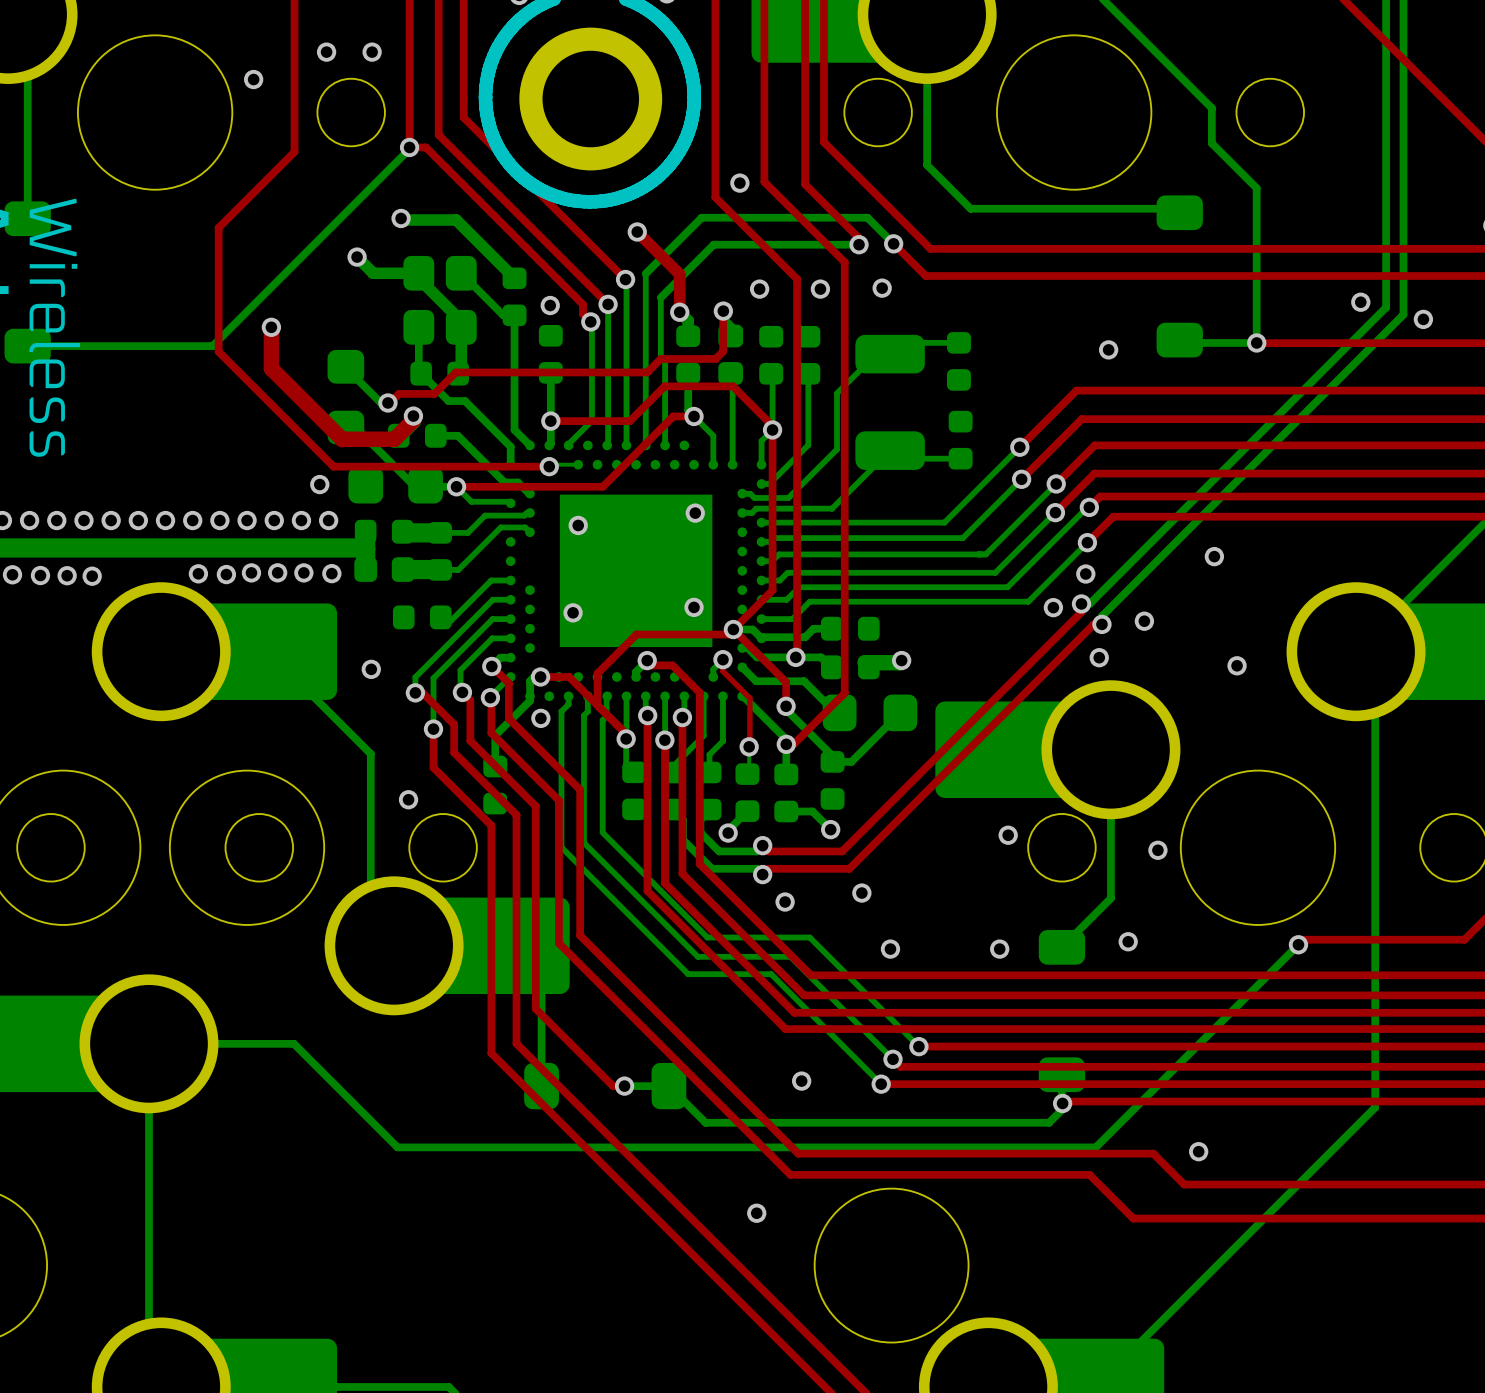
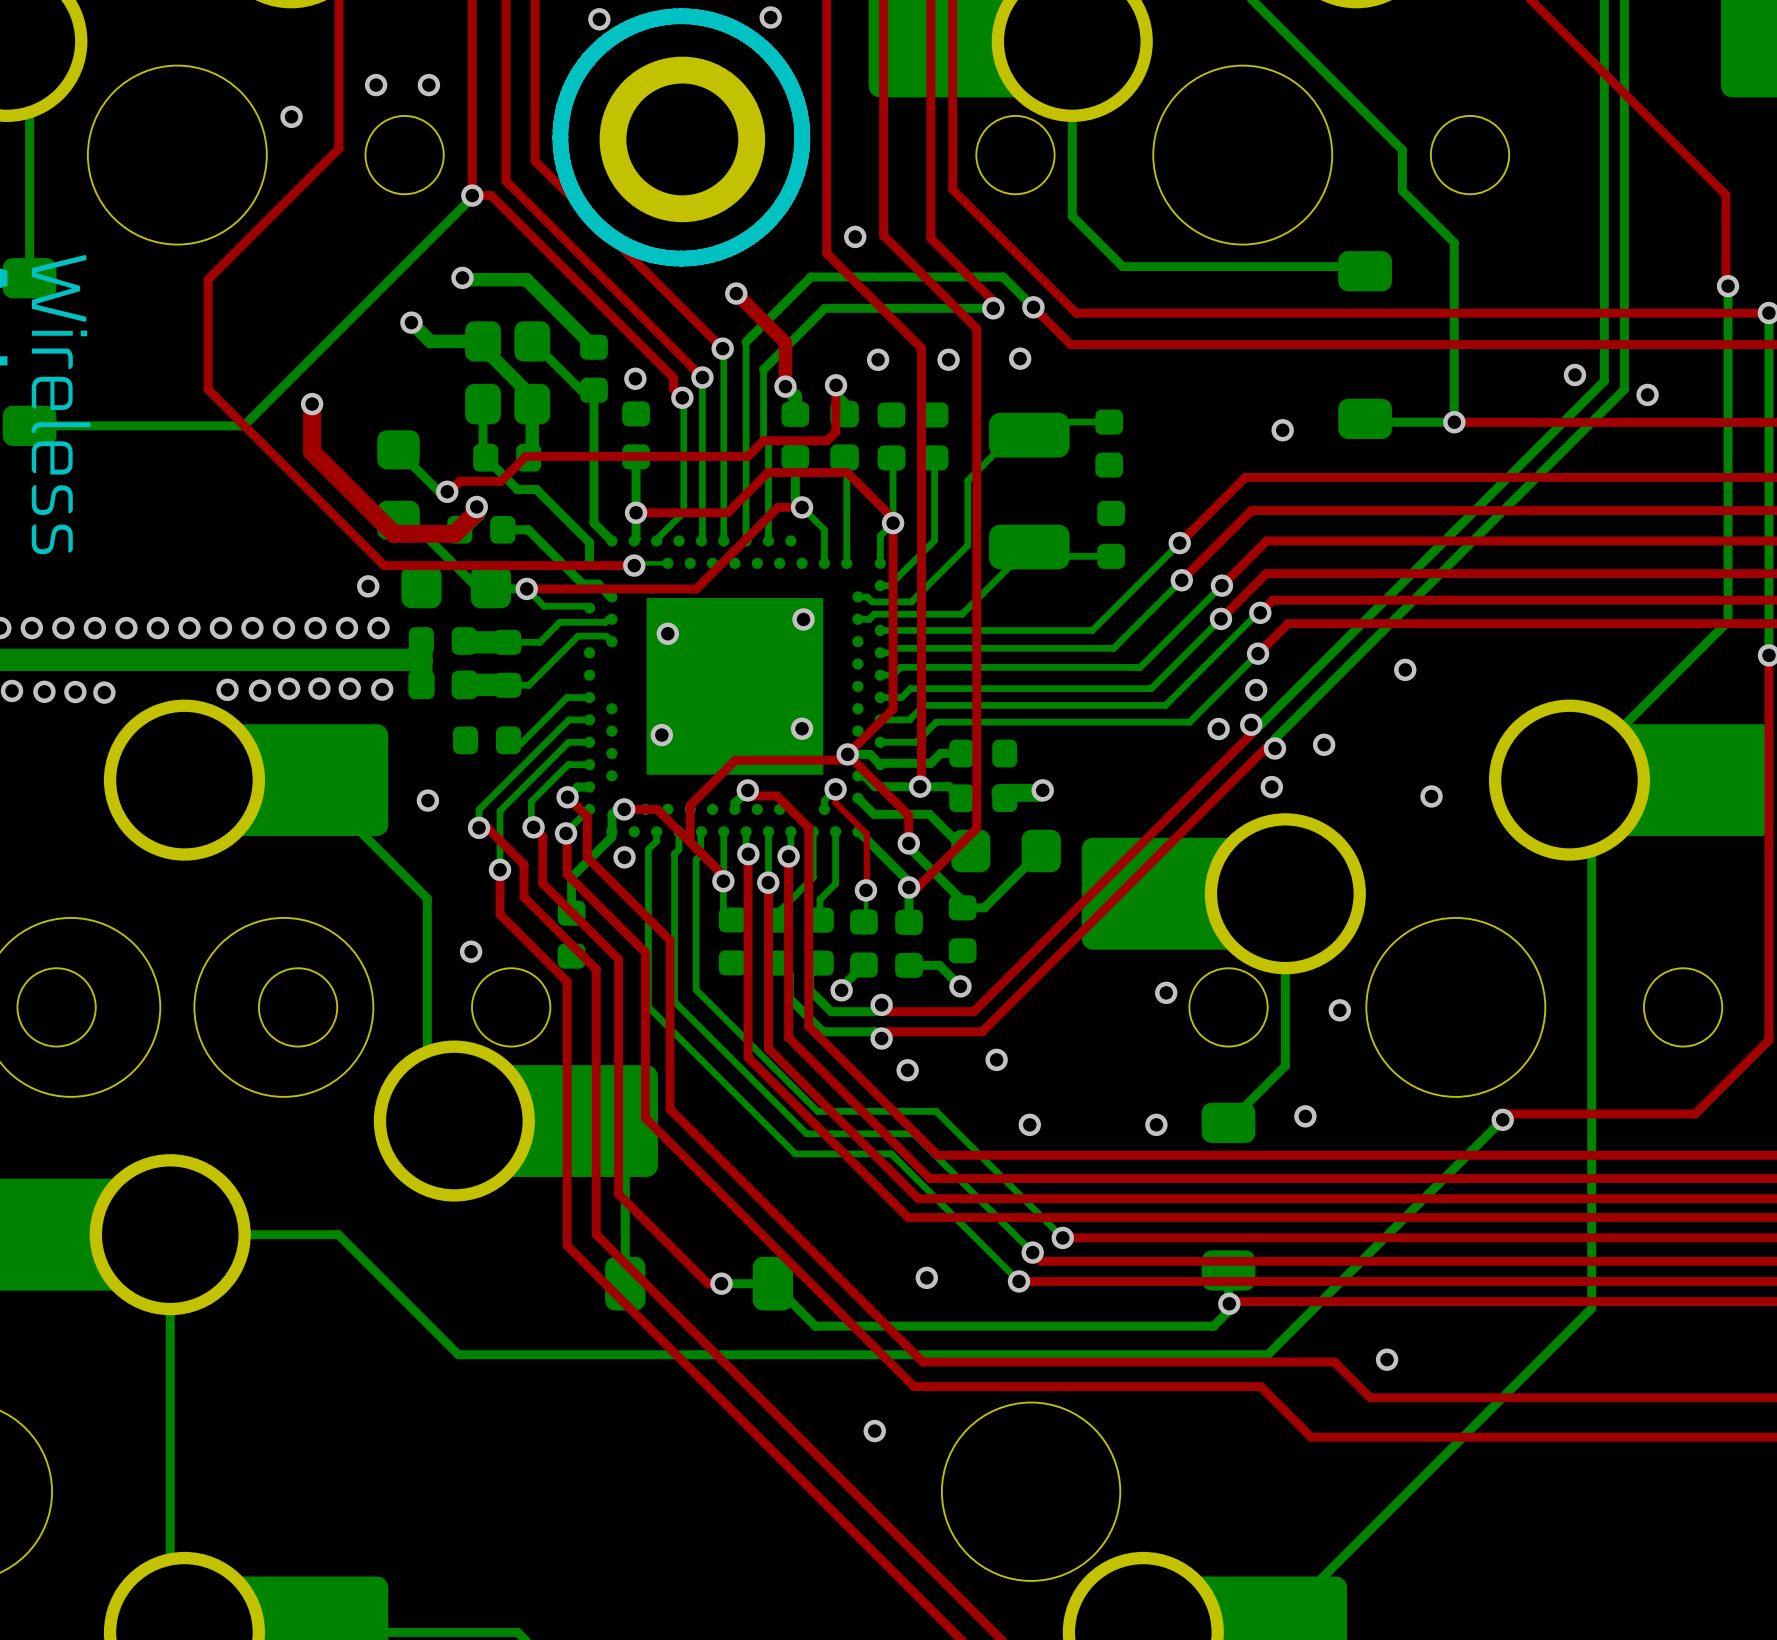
top track: (294, 106) (294, 151) (218, 227) (218, 351) -> (338, 148) (208, 279) (208, 389) (250, 432)

